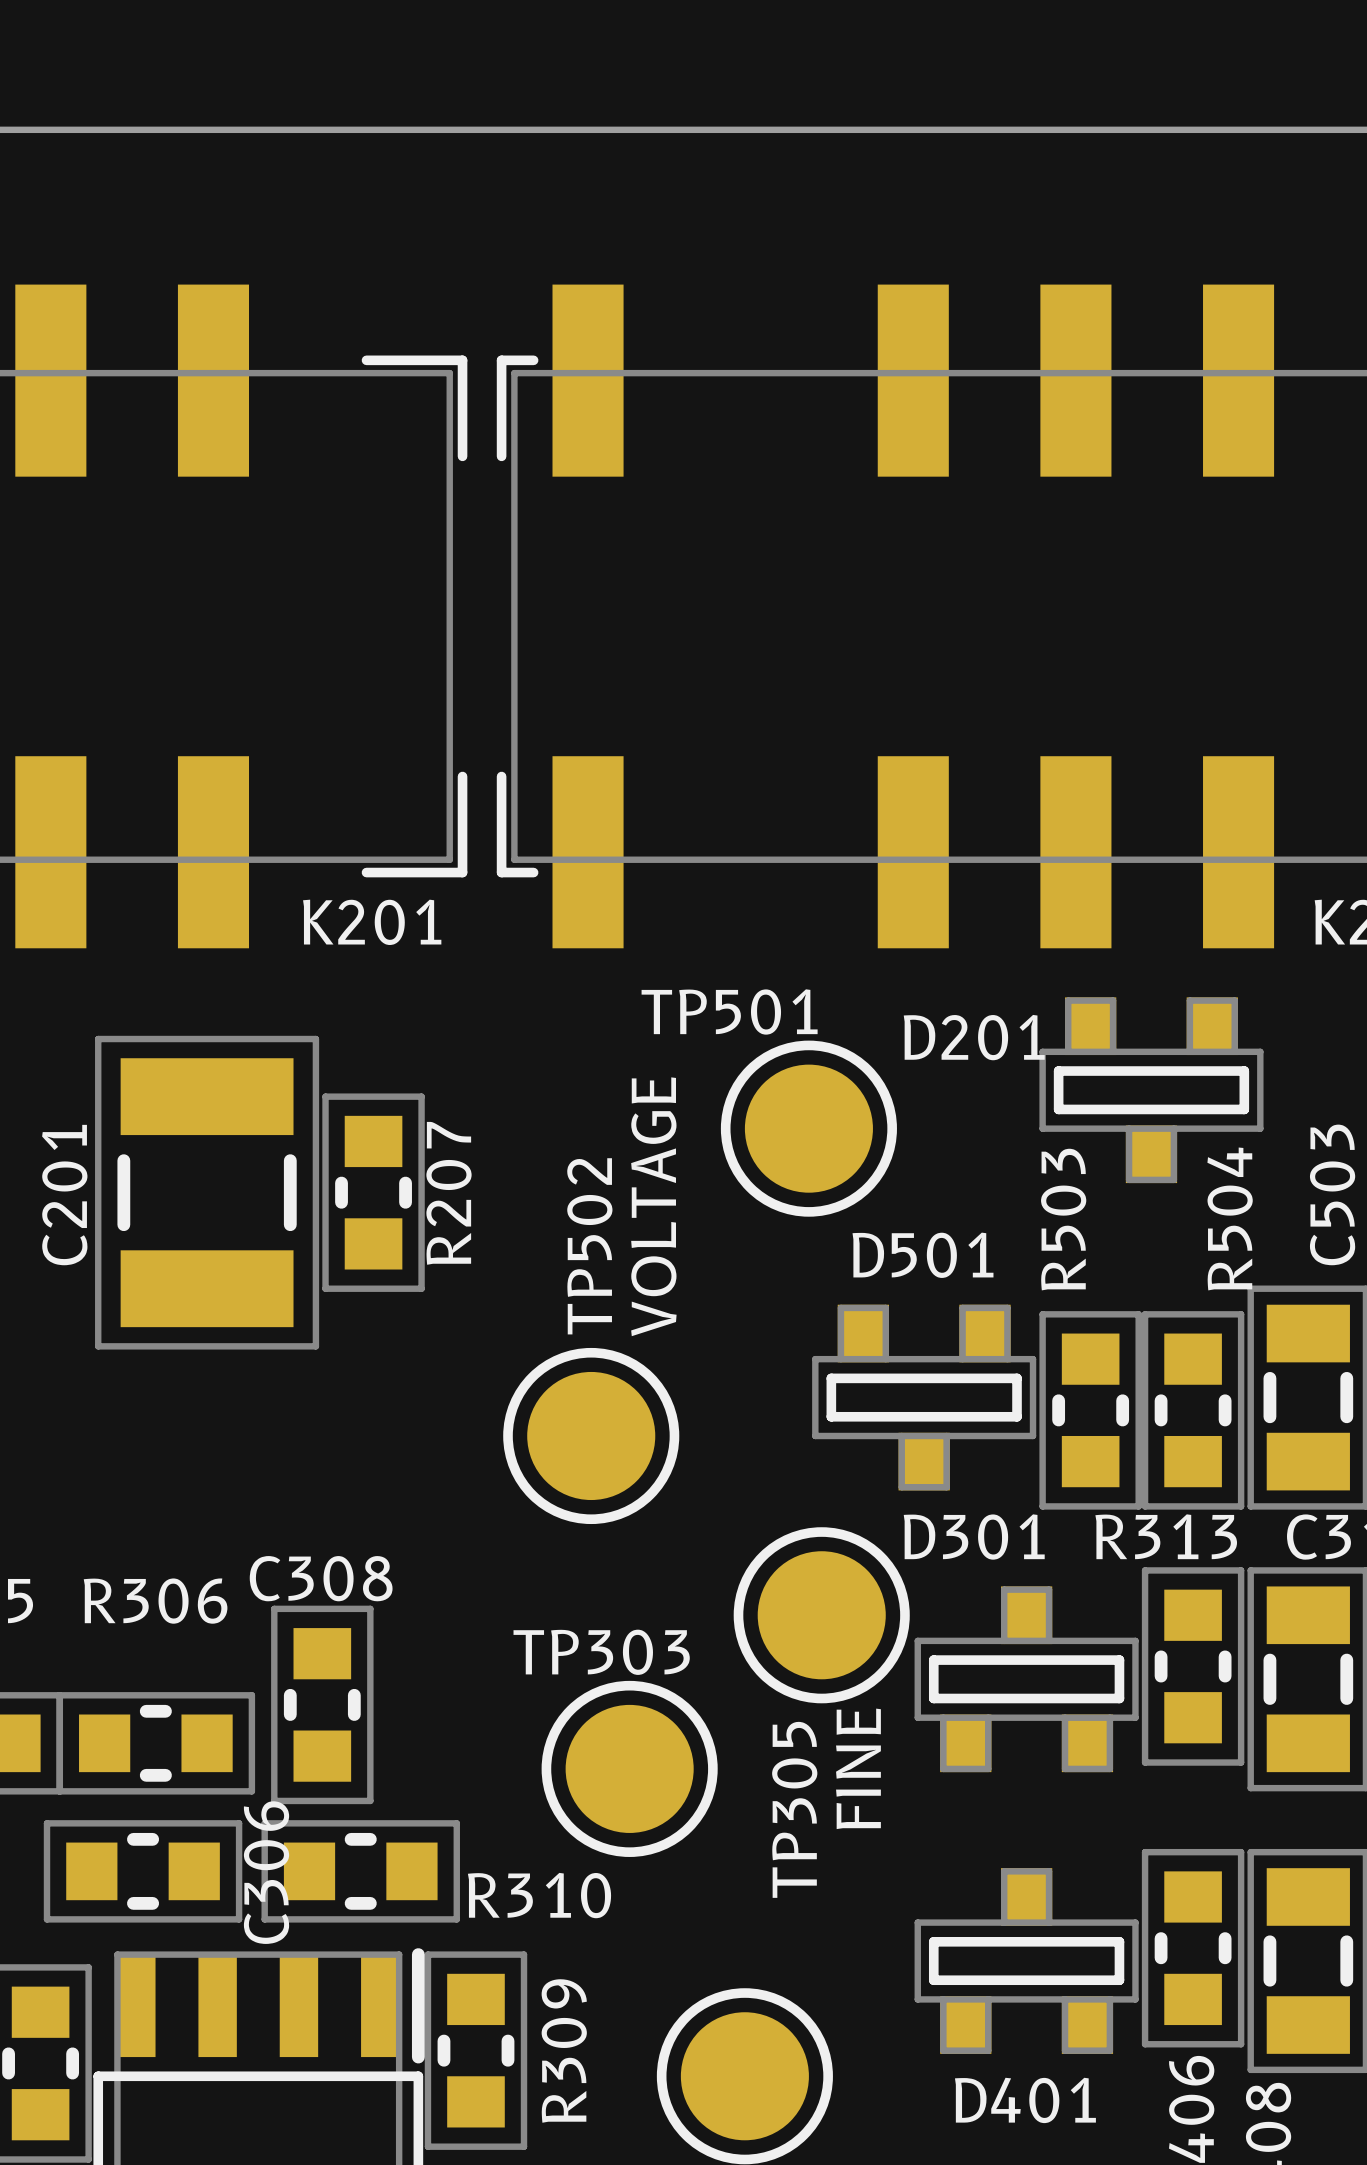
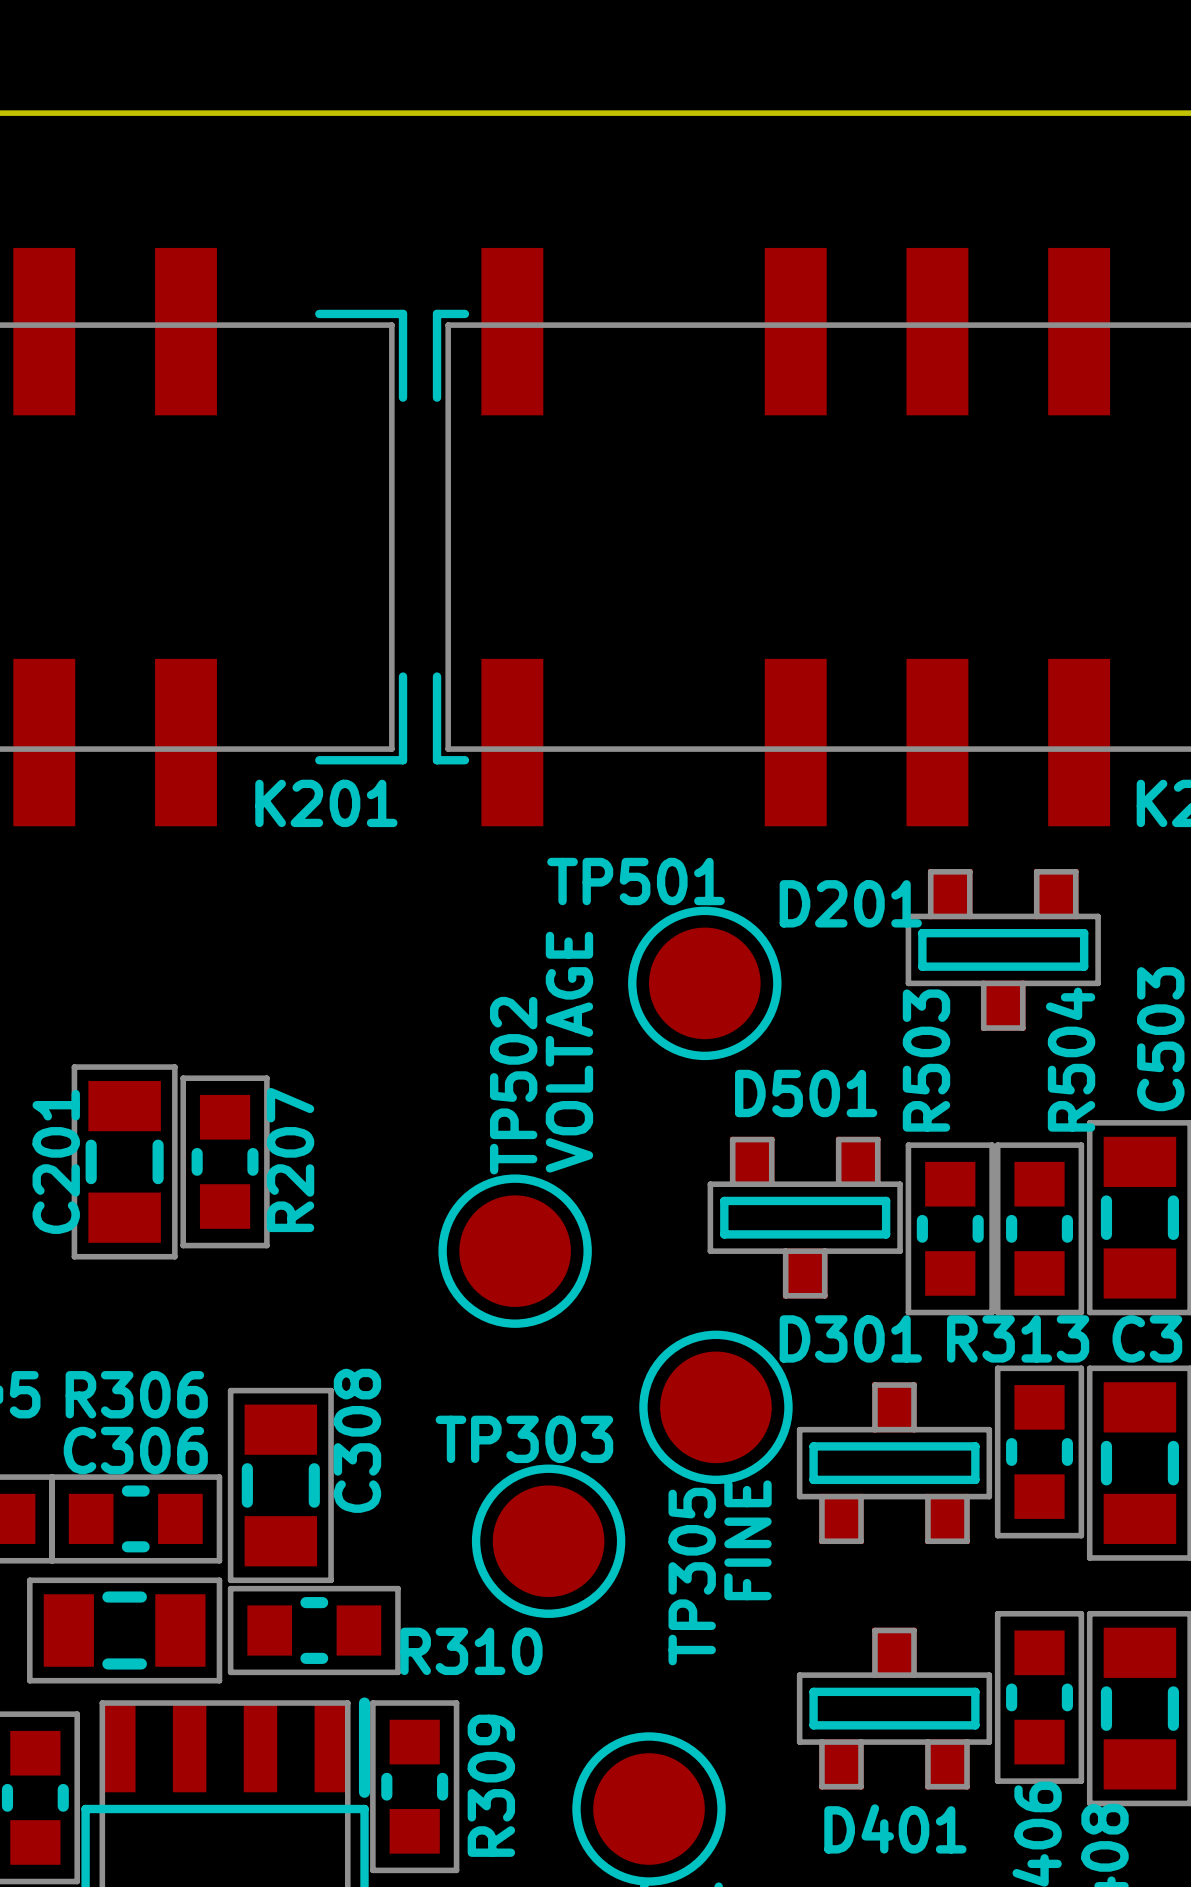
C201 footprint: [95, 1035, 320, 1350] -> [71, 1064, 178, 1260]
R207 position: (373, 1192) -> (225, 1161)
C308 name rotation: 0° (321, 1578) -> 90° counterclockwise (357, 1440)
C308 footprint: [271, 1605, 374, 1805] -> [227, 1387, 334, 1584]
C306 footprint: [43, 1820, 243, 1923] -> [27, 1577, 223, 1684]
C306 name rotation: 0° (266, 1872) -> 90° clockwise (135, 1450)
C306 name position: C306 (266, 1872) -> C306 (135, 1450)

